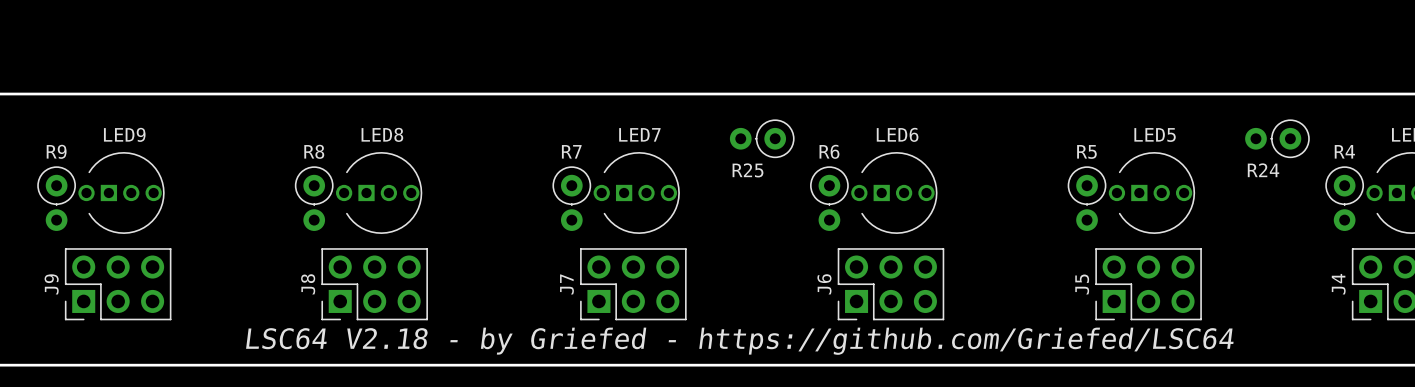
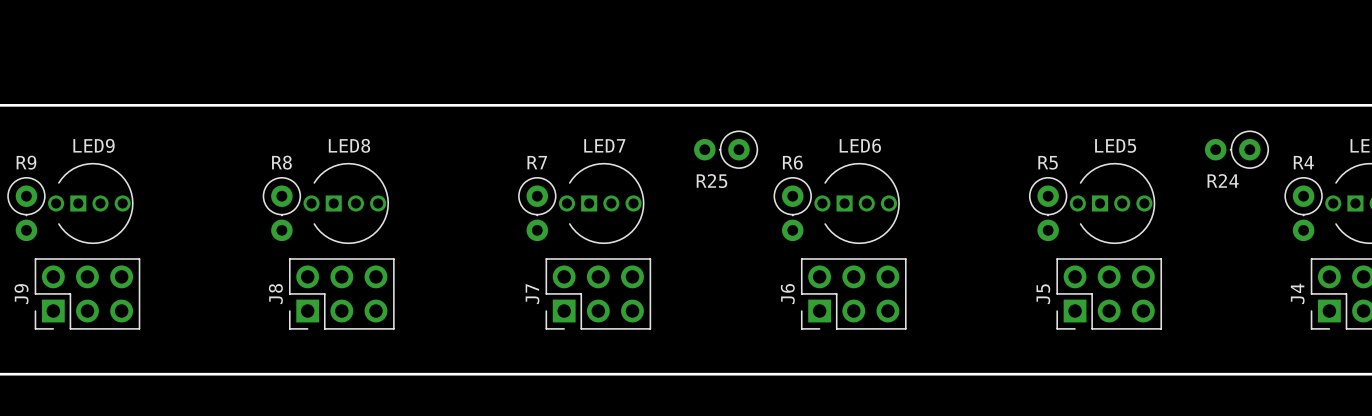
text: LSC64 V2.18 - by Griefed - https://github.com/Griefed/LSC64 (739, 341) -> none

